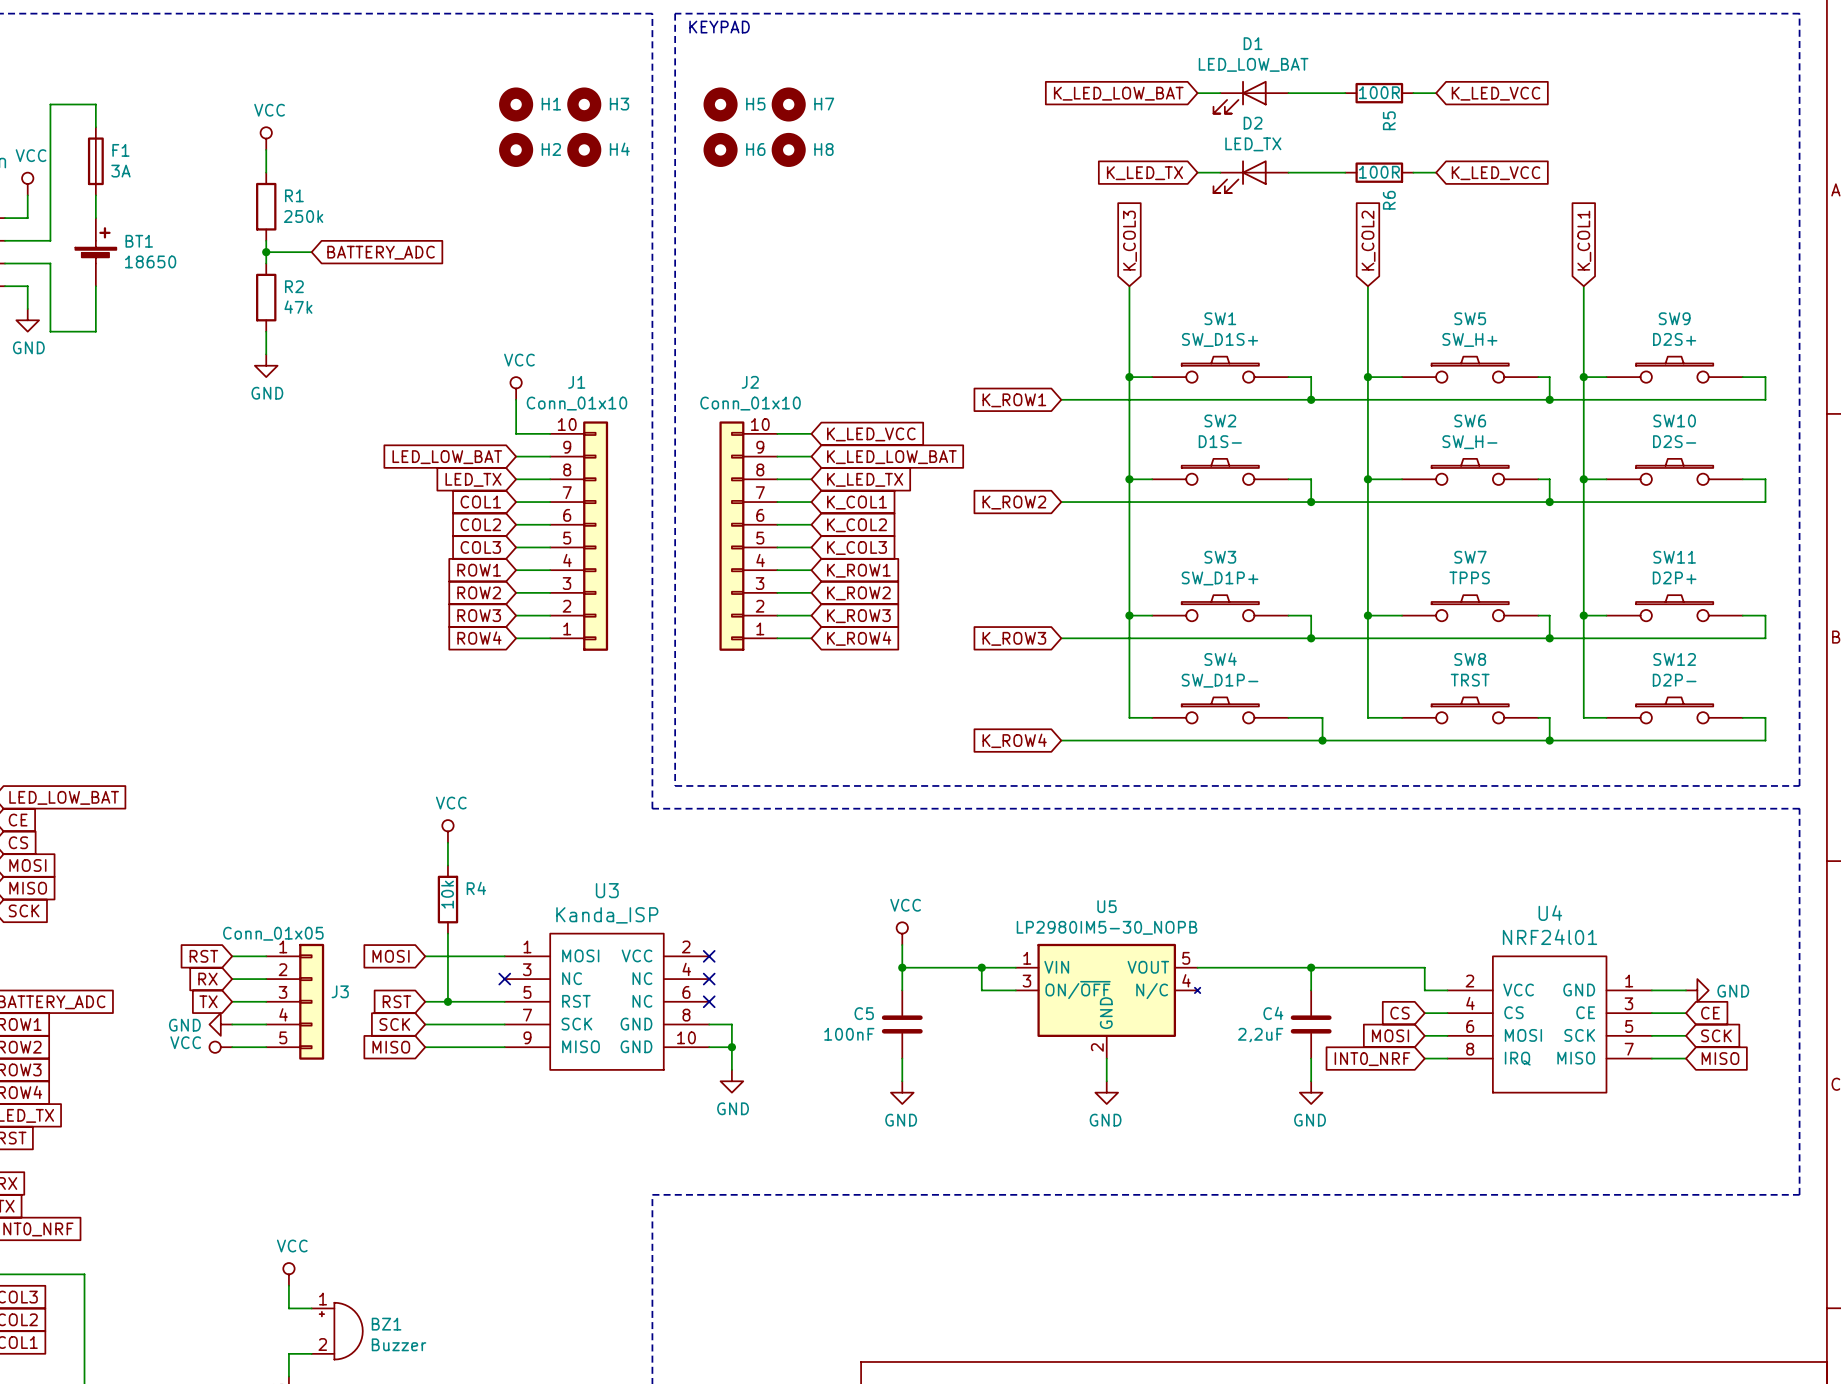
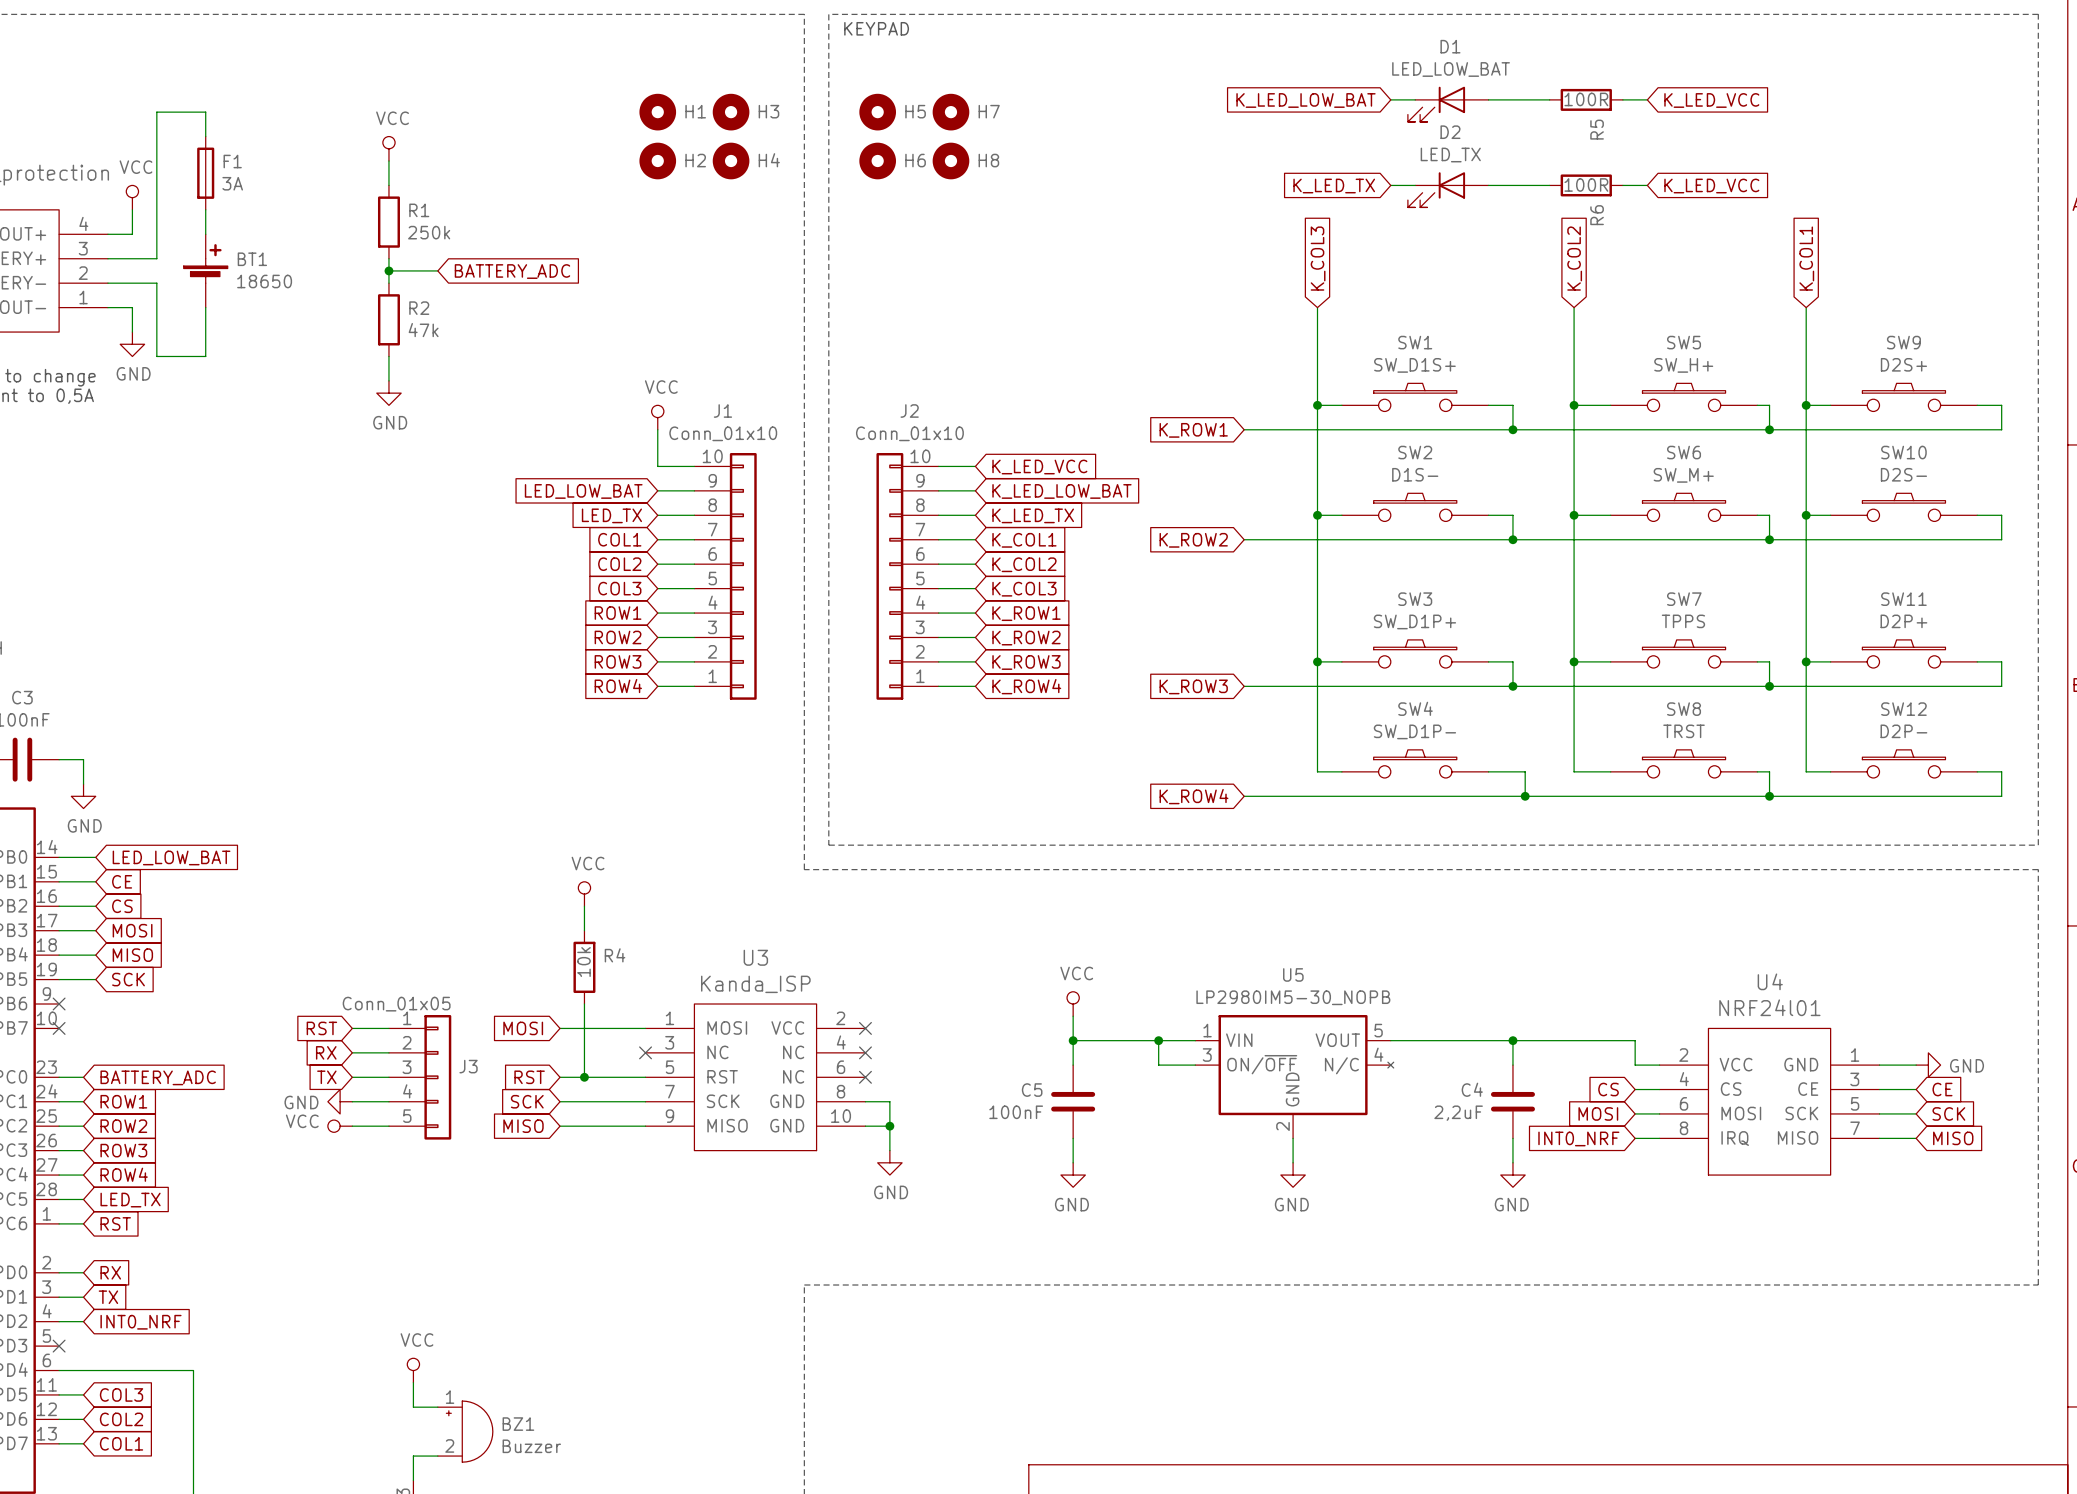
SW6 value: SW_H- (1469, 442) -> SW_M+ (1683, 475)

